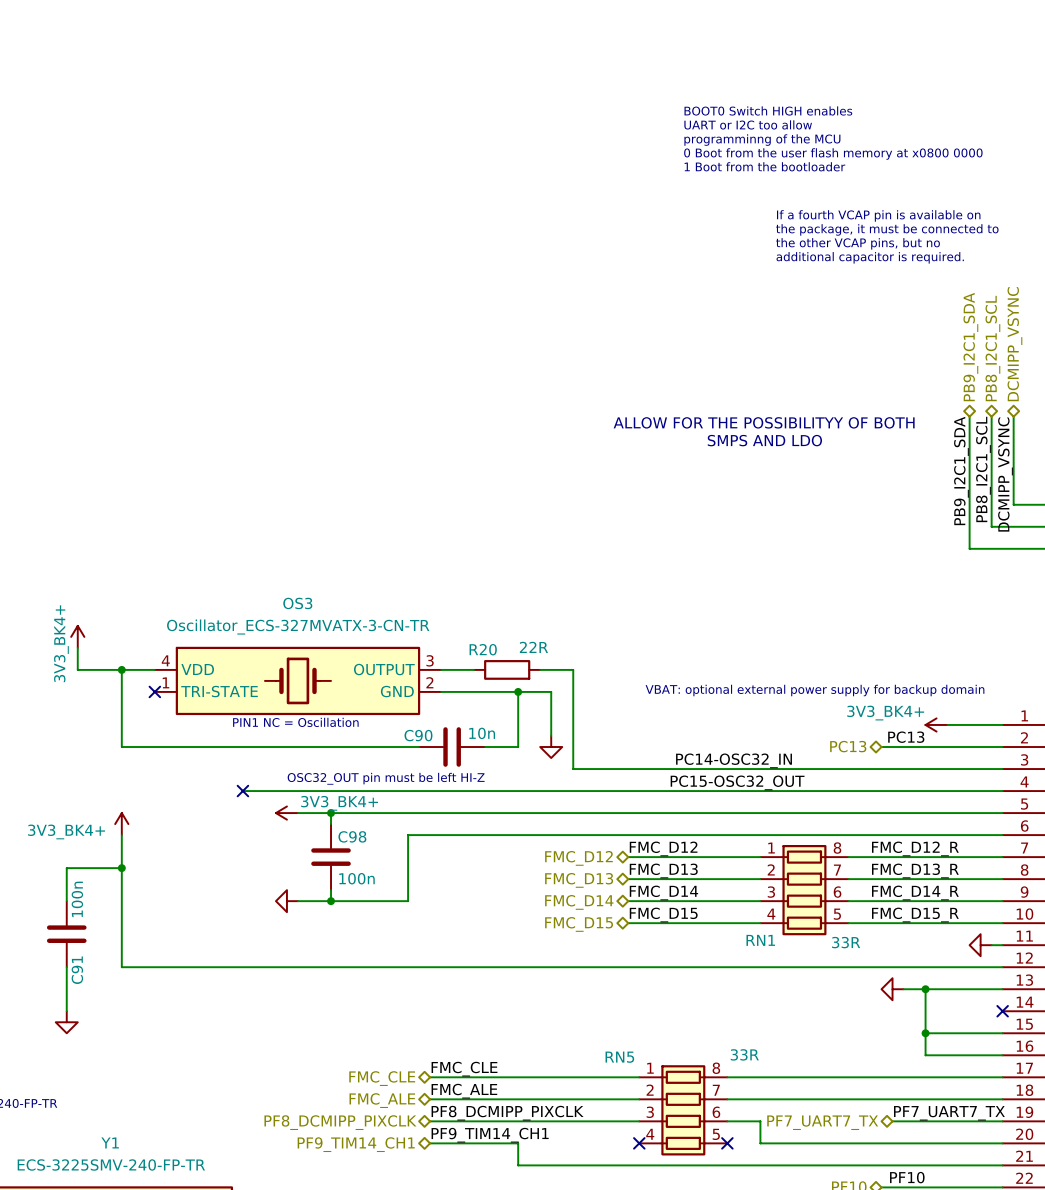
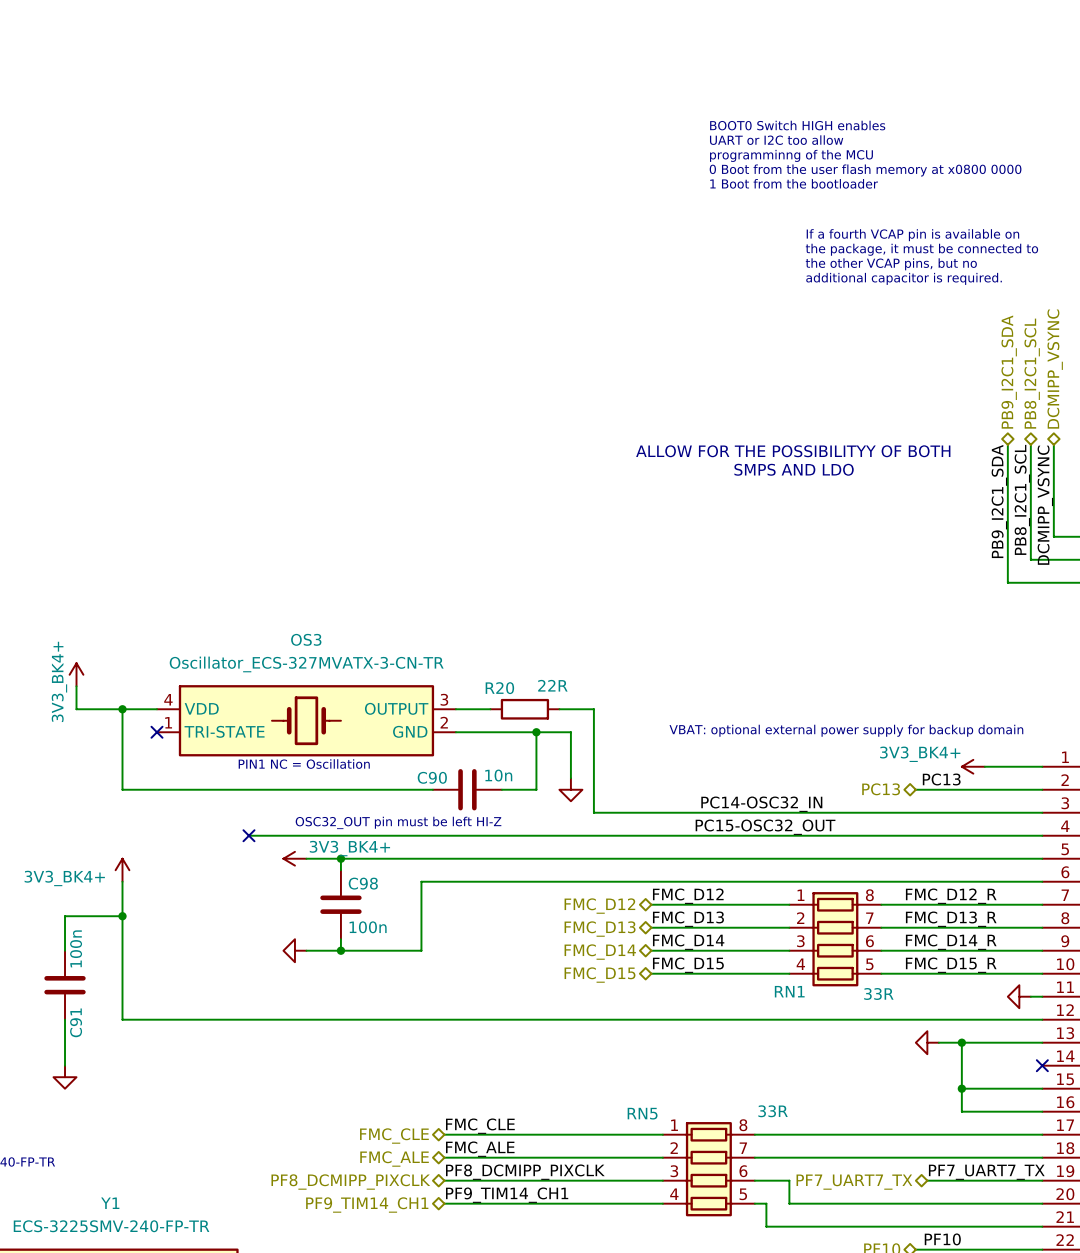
wire: (518, 1143) (518, 1165) (738, 1165) -> (536, 1203) (662, 1203)
no-connect mark: (639, 1143) -> none
wire: none -> (754, 1203) (766, 1203) (766, 1226)
no-connect mark: (727, 1143) -> none

